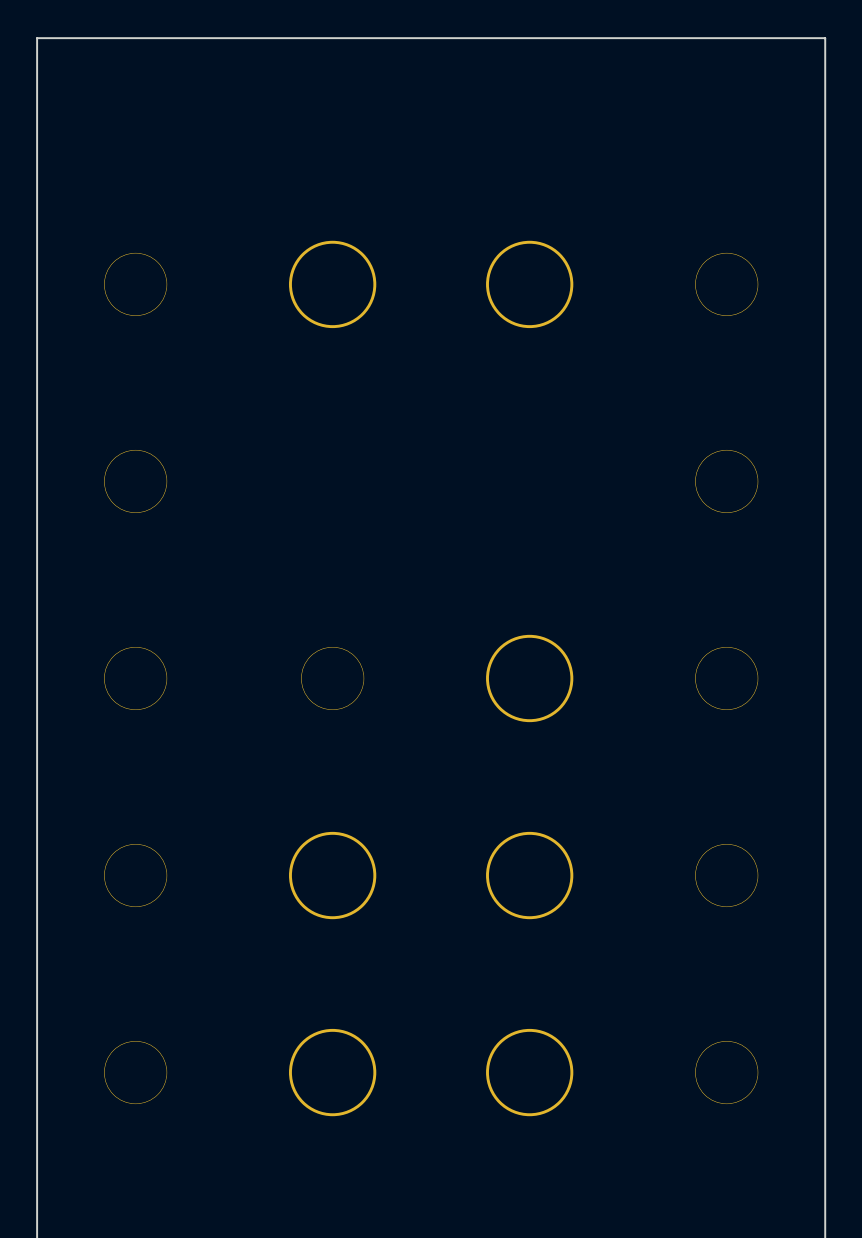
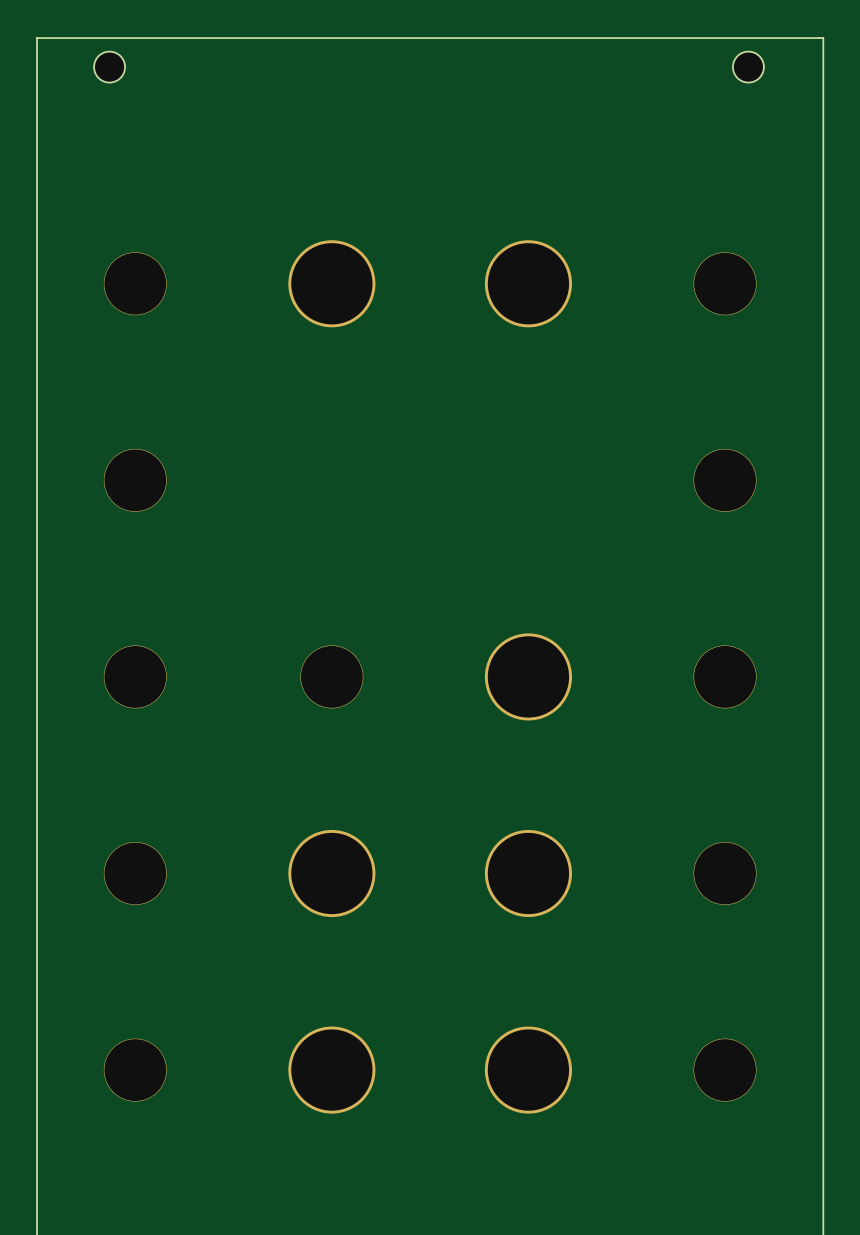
part: none -> (109, 67)
part: none -> (748, 67)

